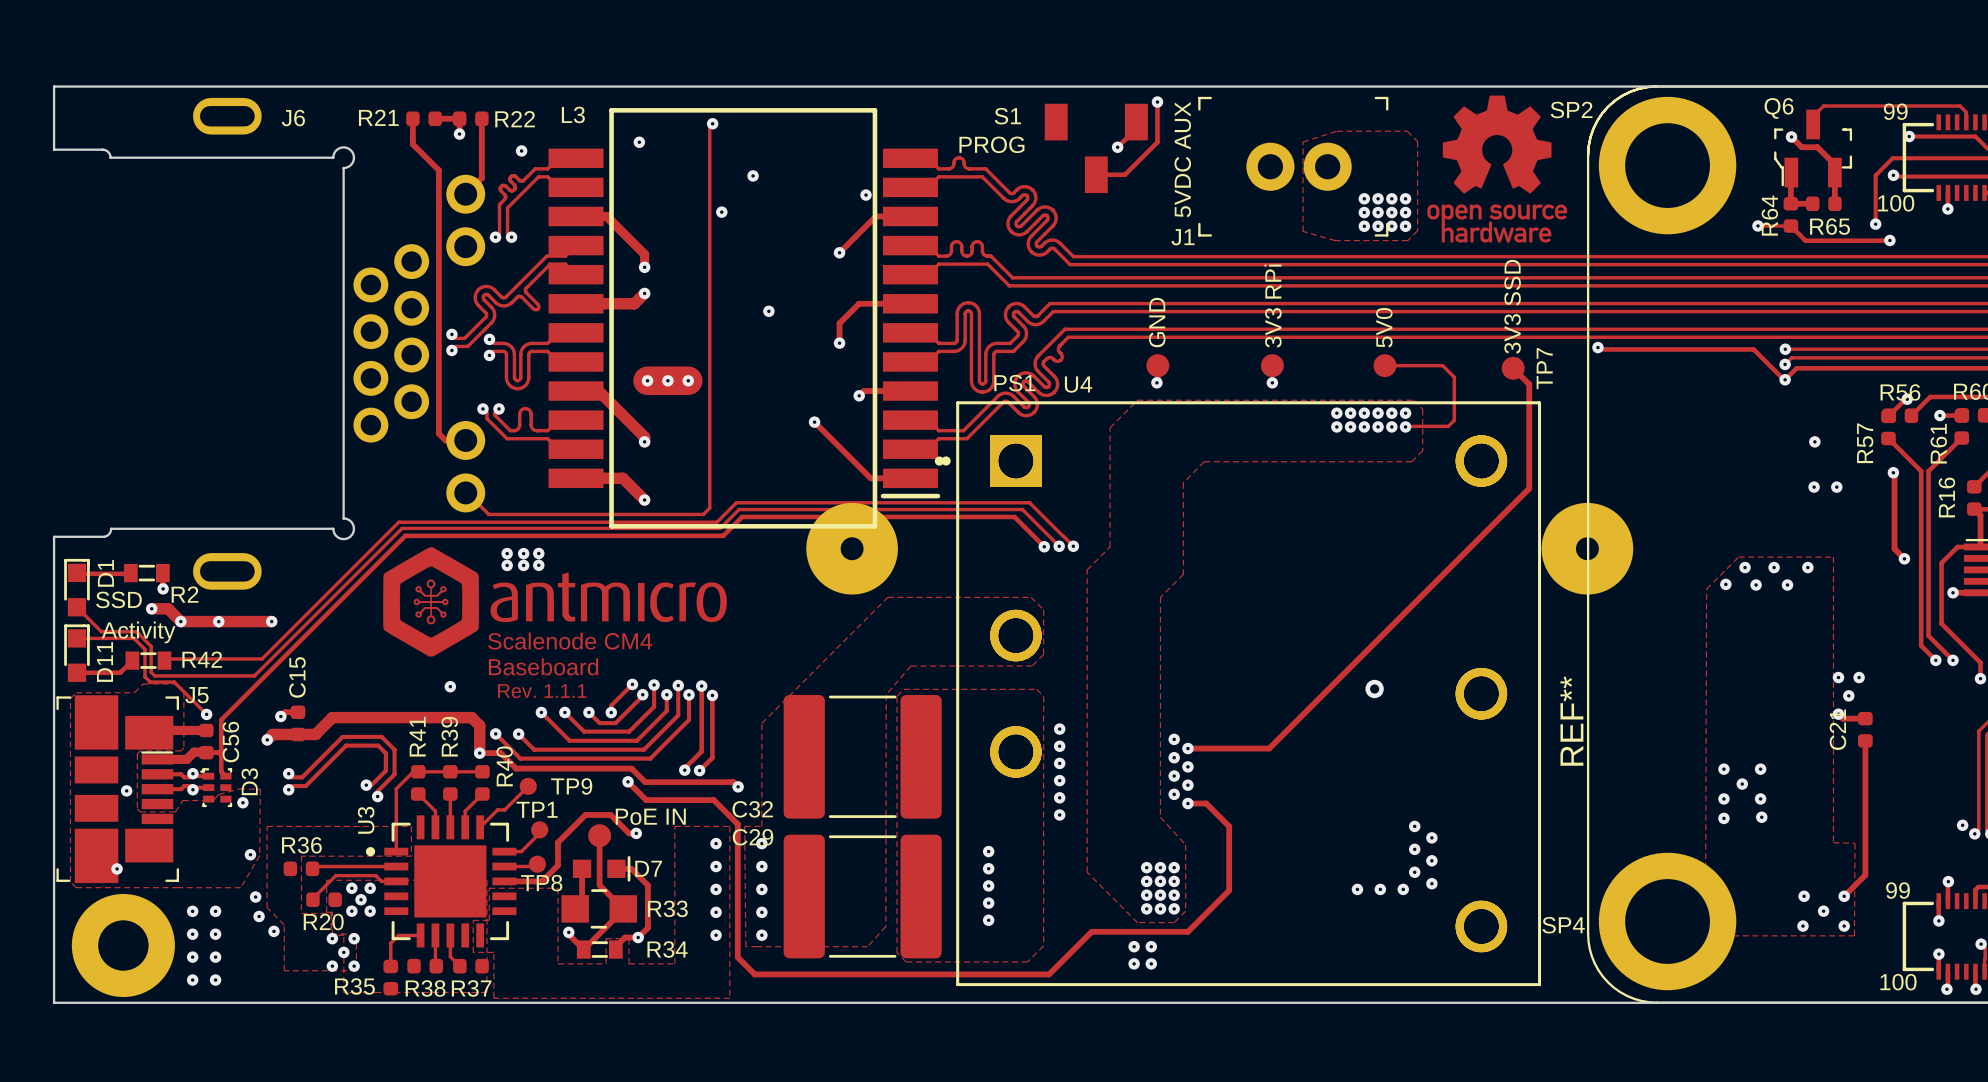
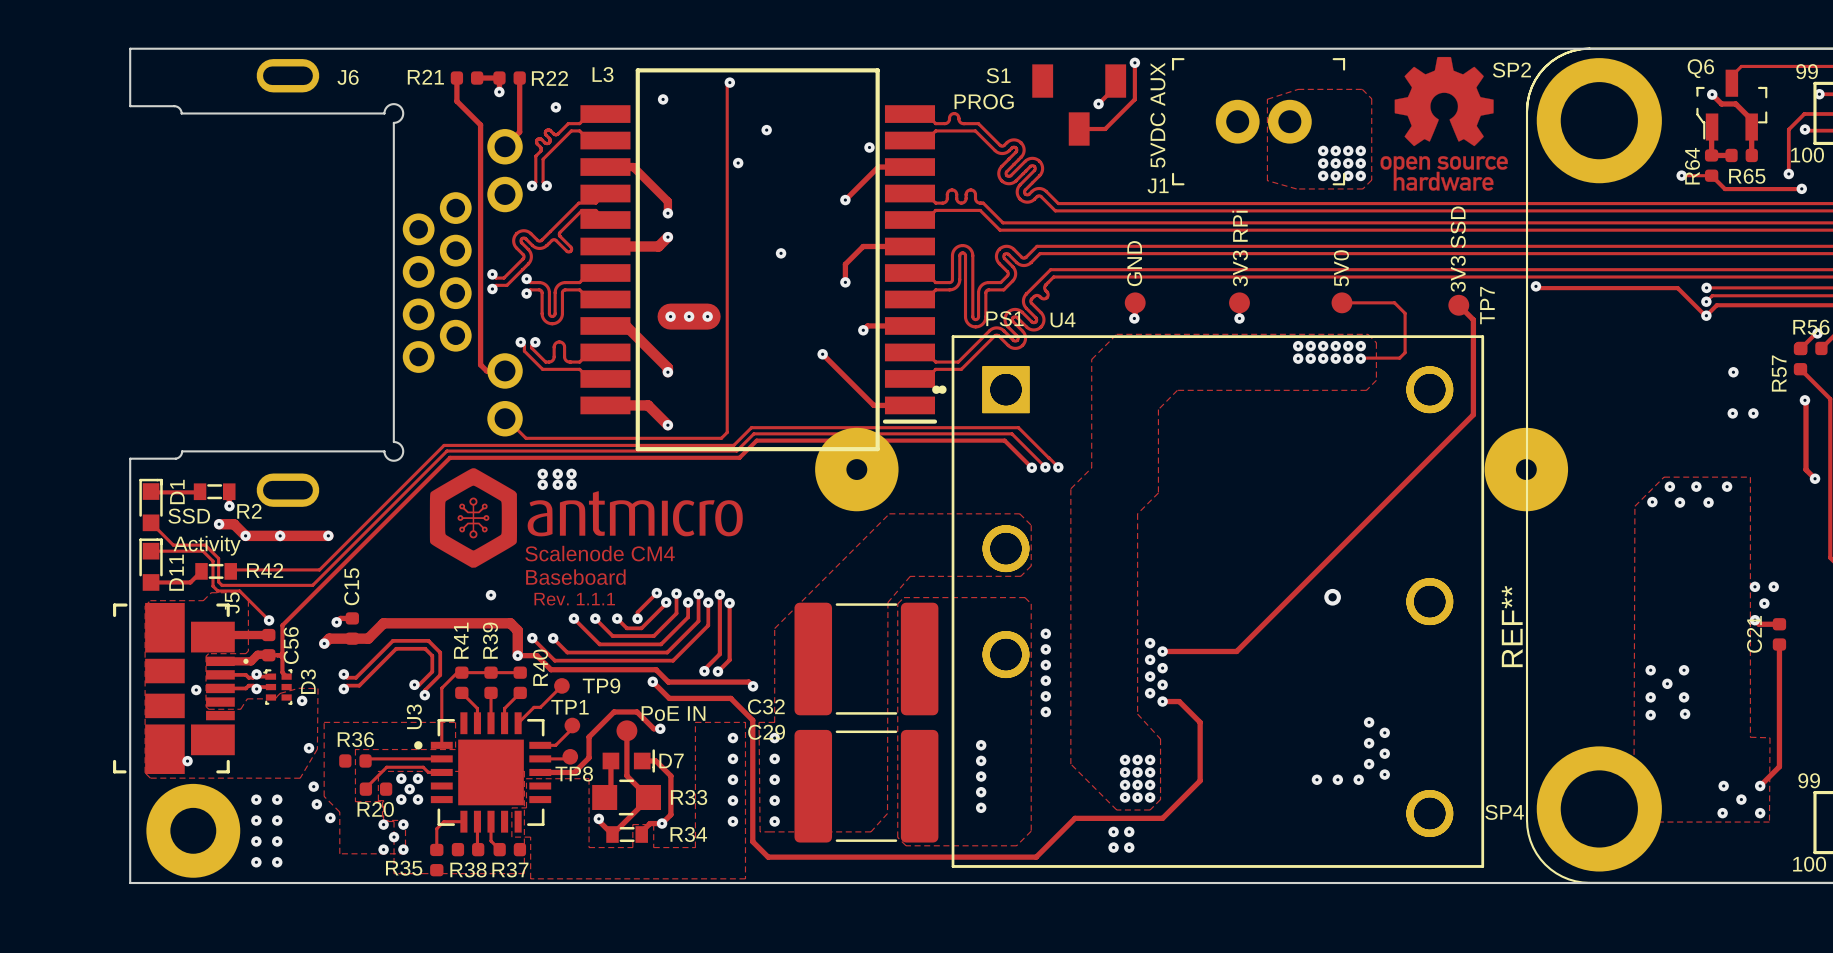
J5 footprint: [56, 695, 179, 884] -> [113, 602, 249, 774]

